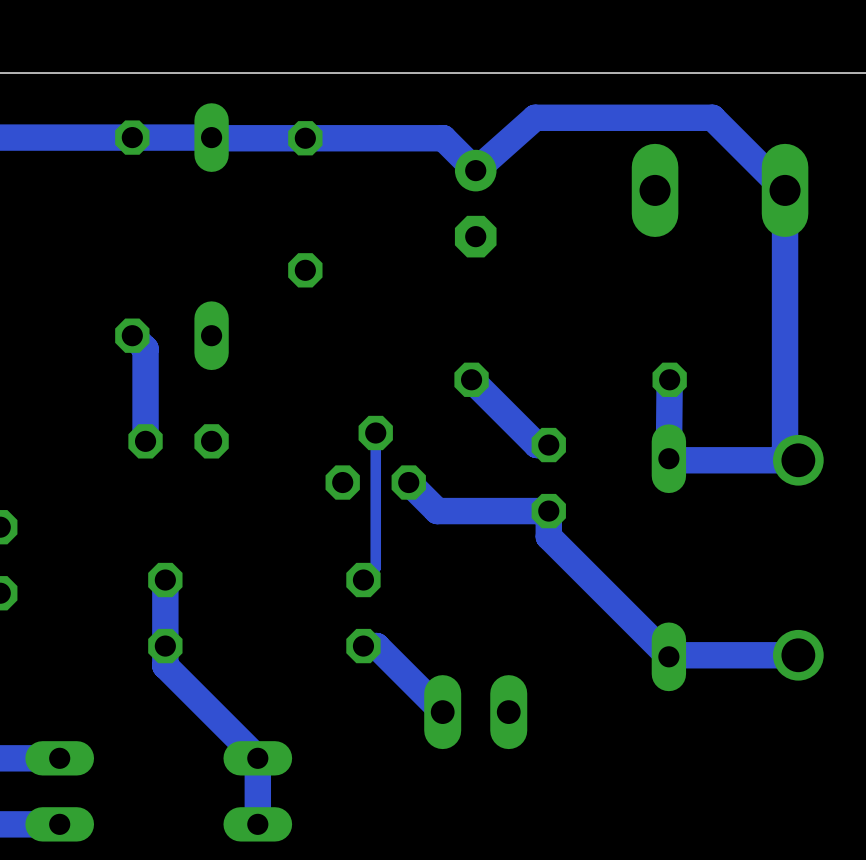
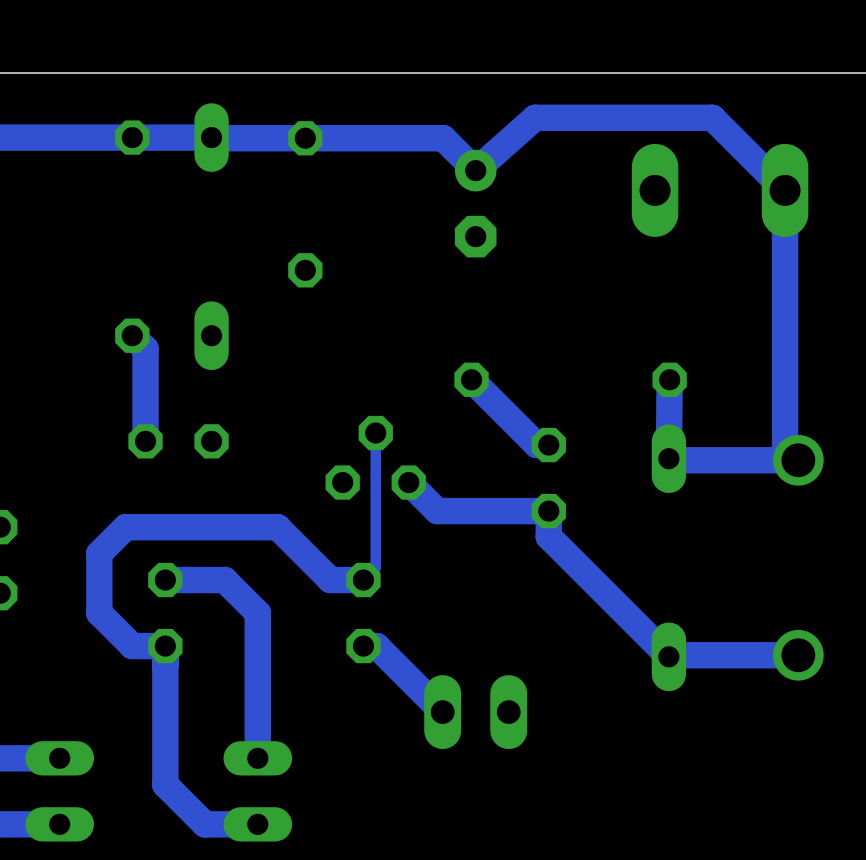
track: (165, 580) (165, 646) -> (165, 580) (224, 580) (257, 613) (257, 758)
track: none -> (363, 580) (330, 580) (277, 527) (125, 527) (99, 553) (99, 613) (132, 646) (165, 646)
track: (165, 665) (257, 758) (257, 824) -> (165, 665) (165, 784) (204, 824) (257, 824)

